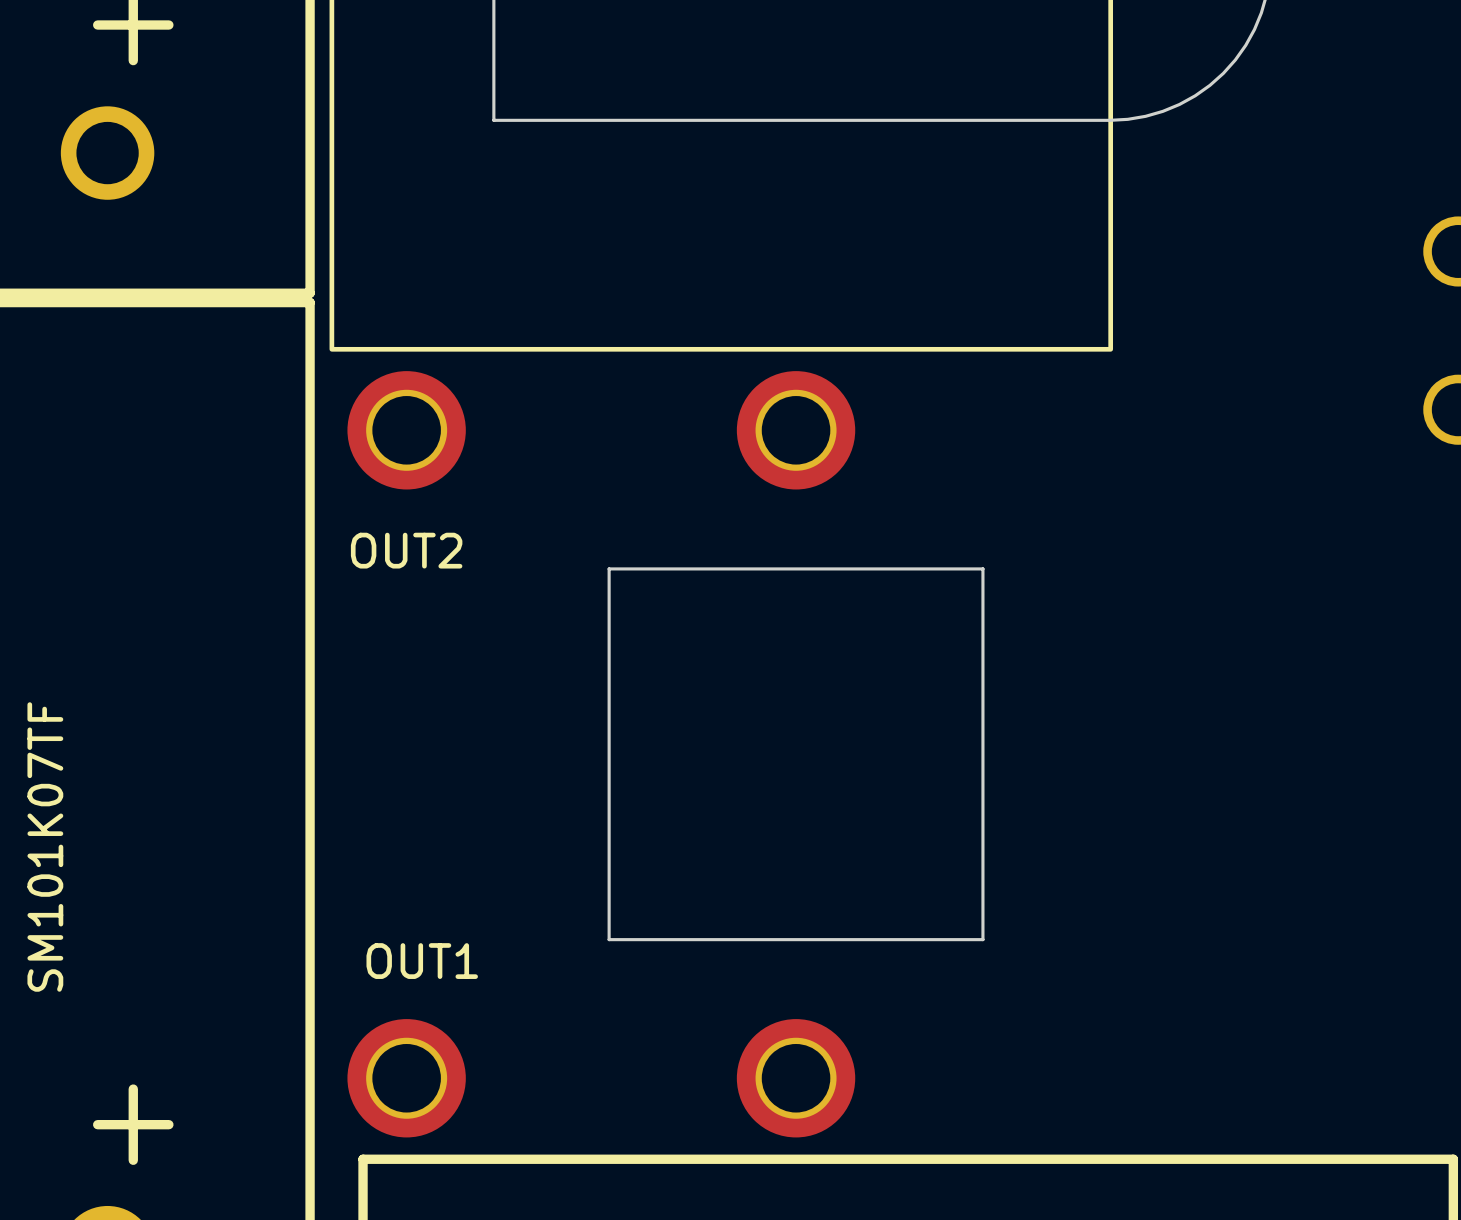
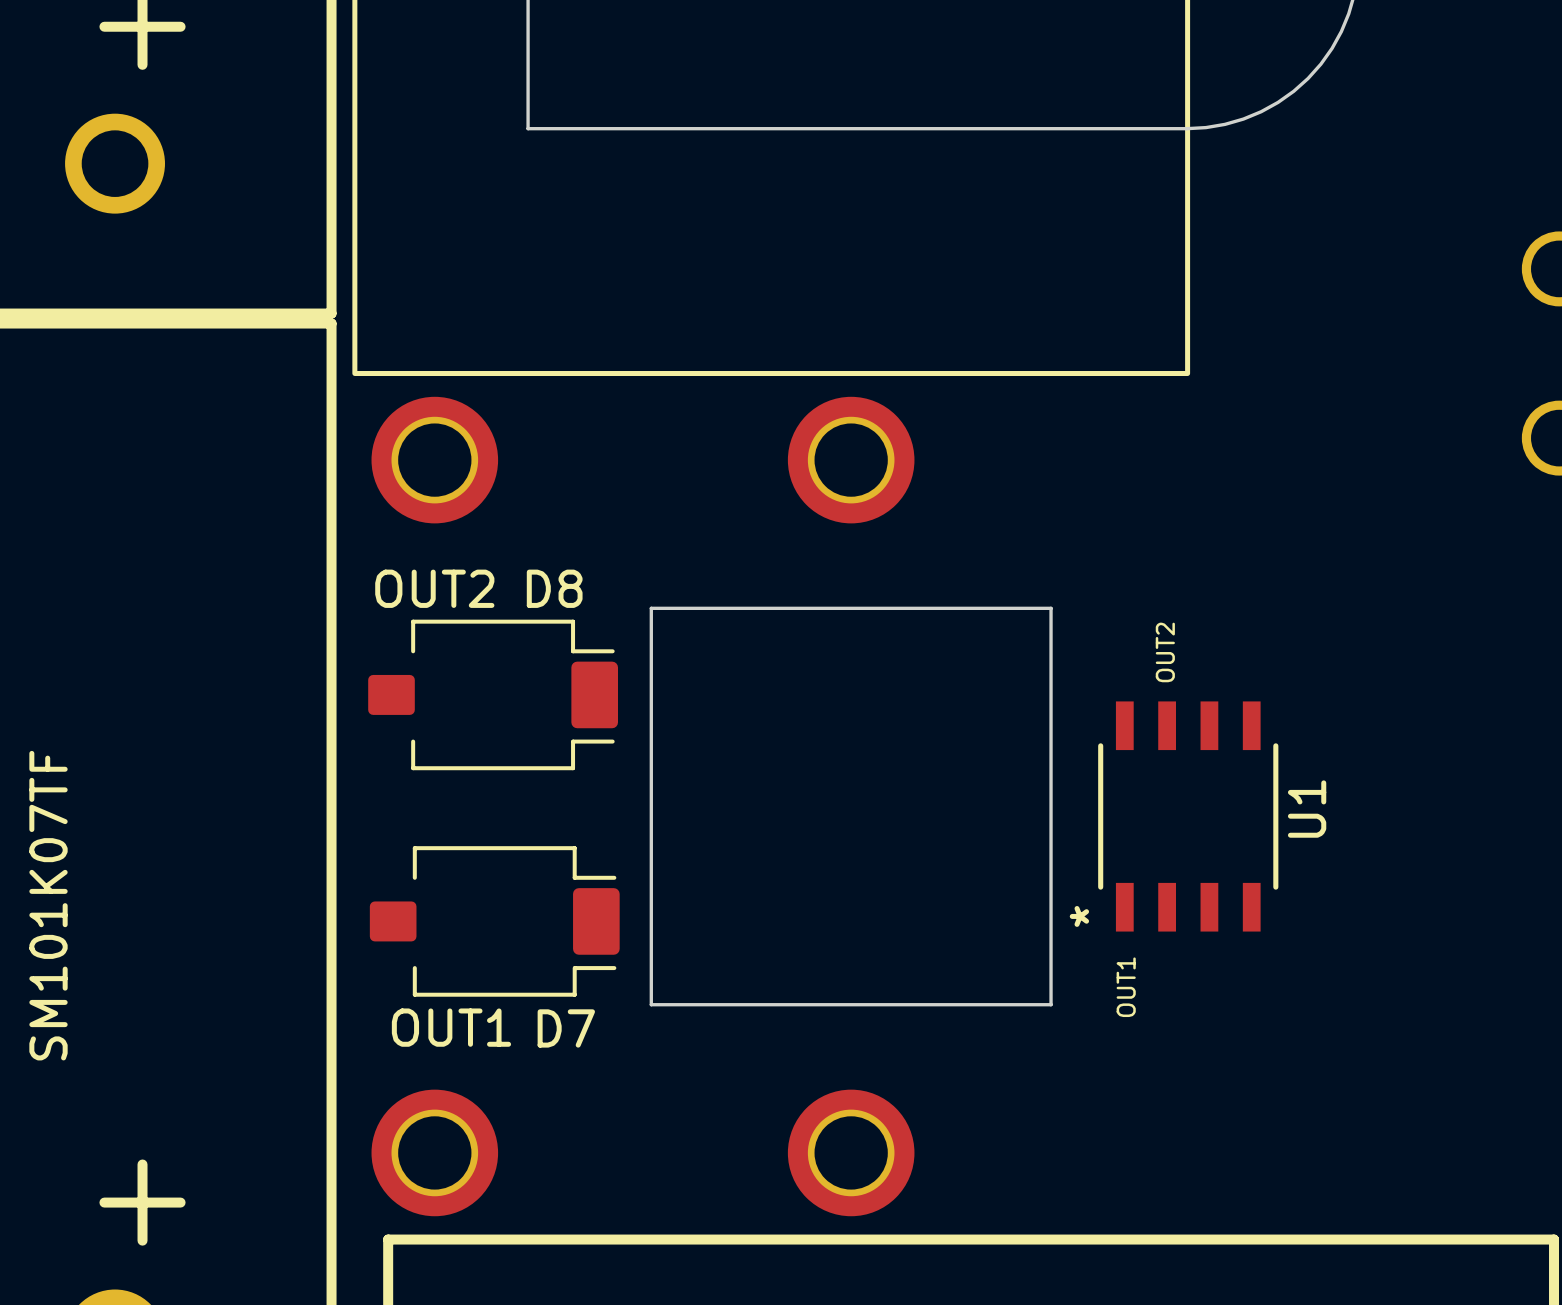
text: none -> OUT2 (1165, 652)
D8: none -> (493, 694)
U1: none -> (1188, 816)
D7: none -> (494, 921)
text: none -> OUT1 (1126, 987)

